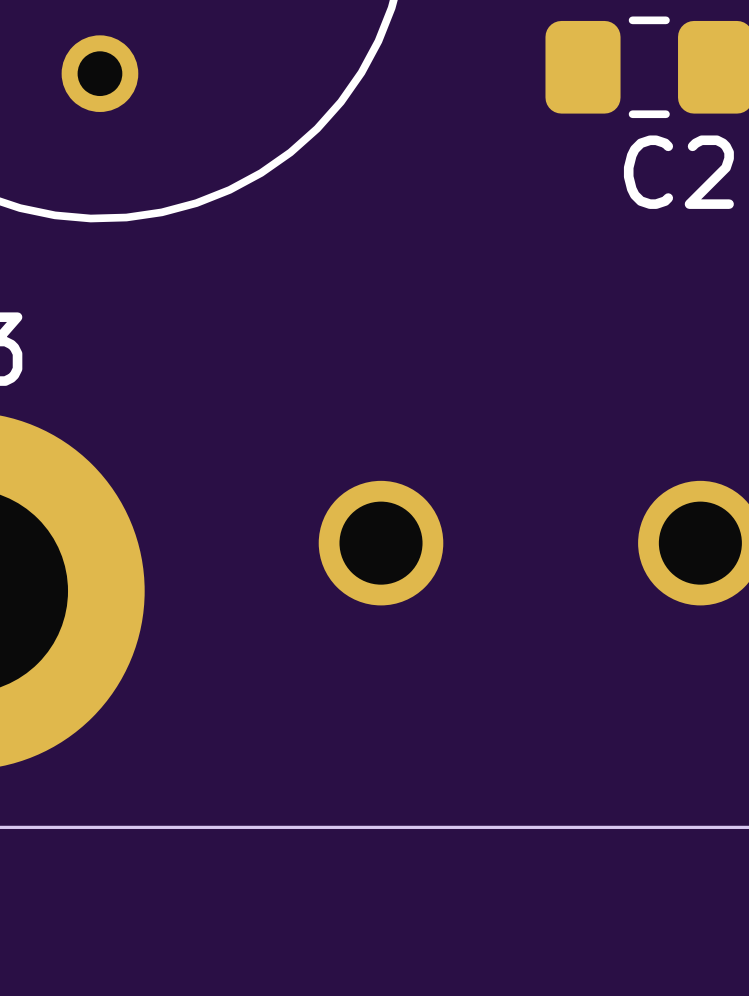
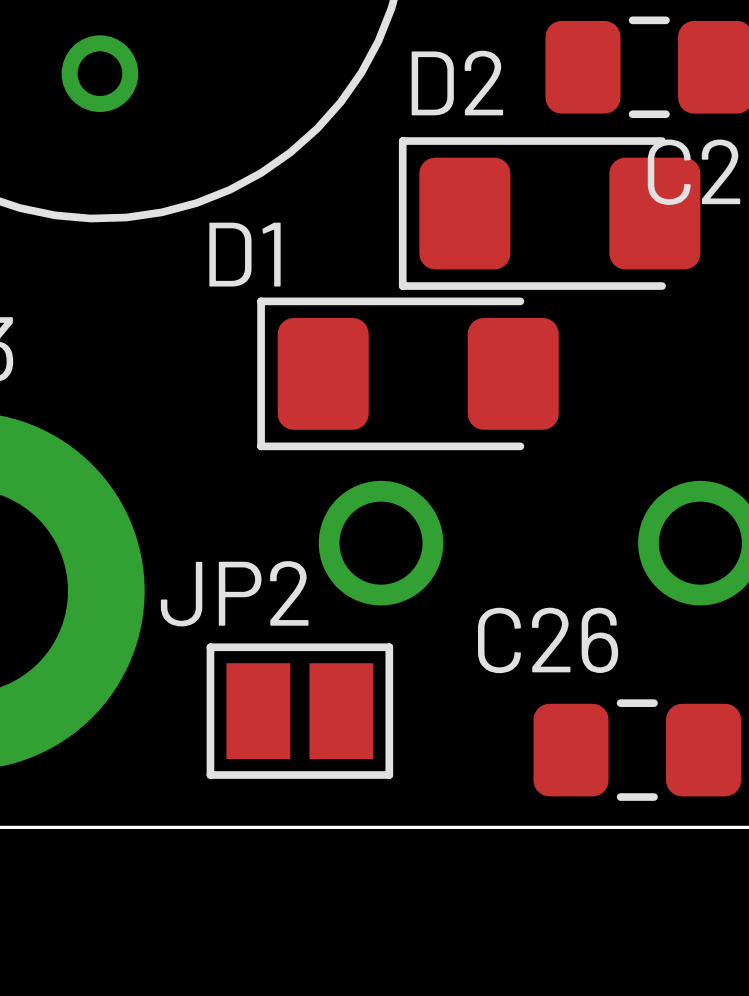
D2: none -> (549, 213)
D1: none -> (407, 373)
JP2: none -> (299, 711)
C26: none -> (637, 750)

